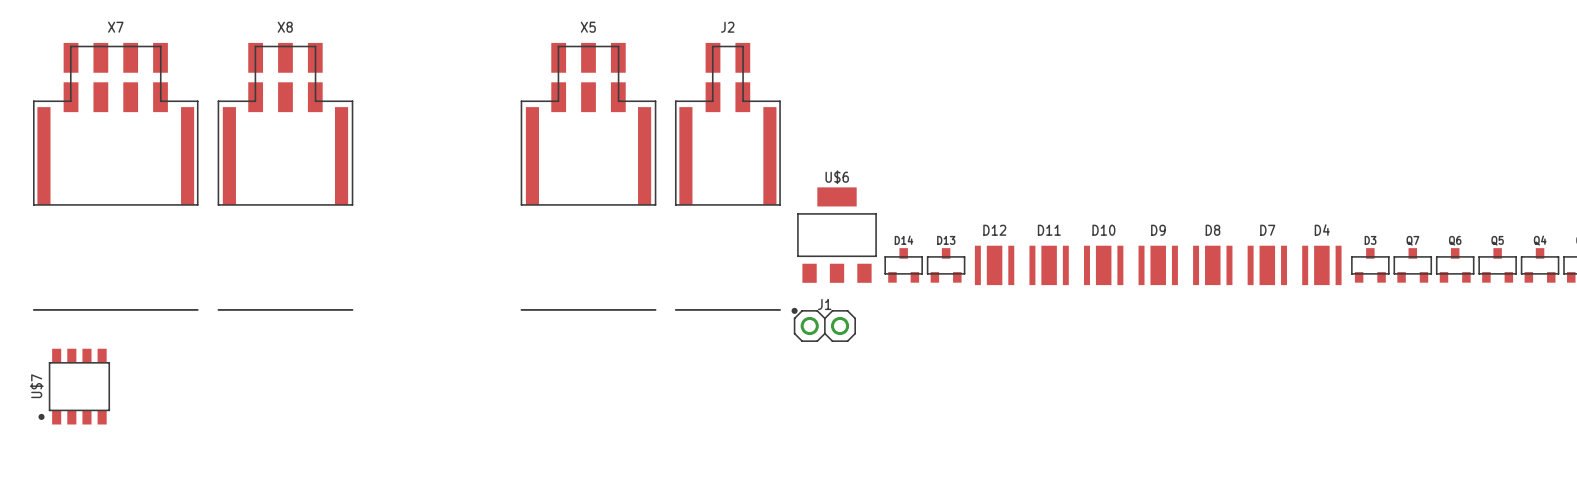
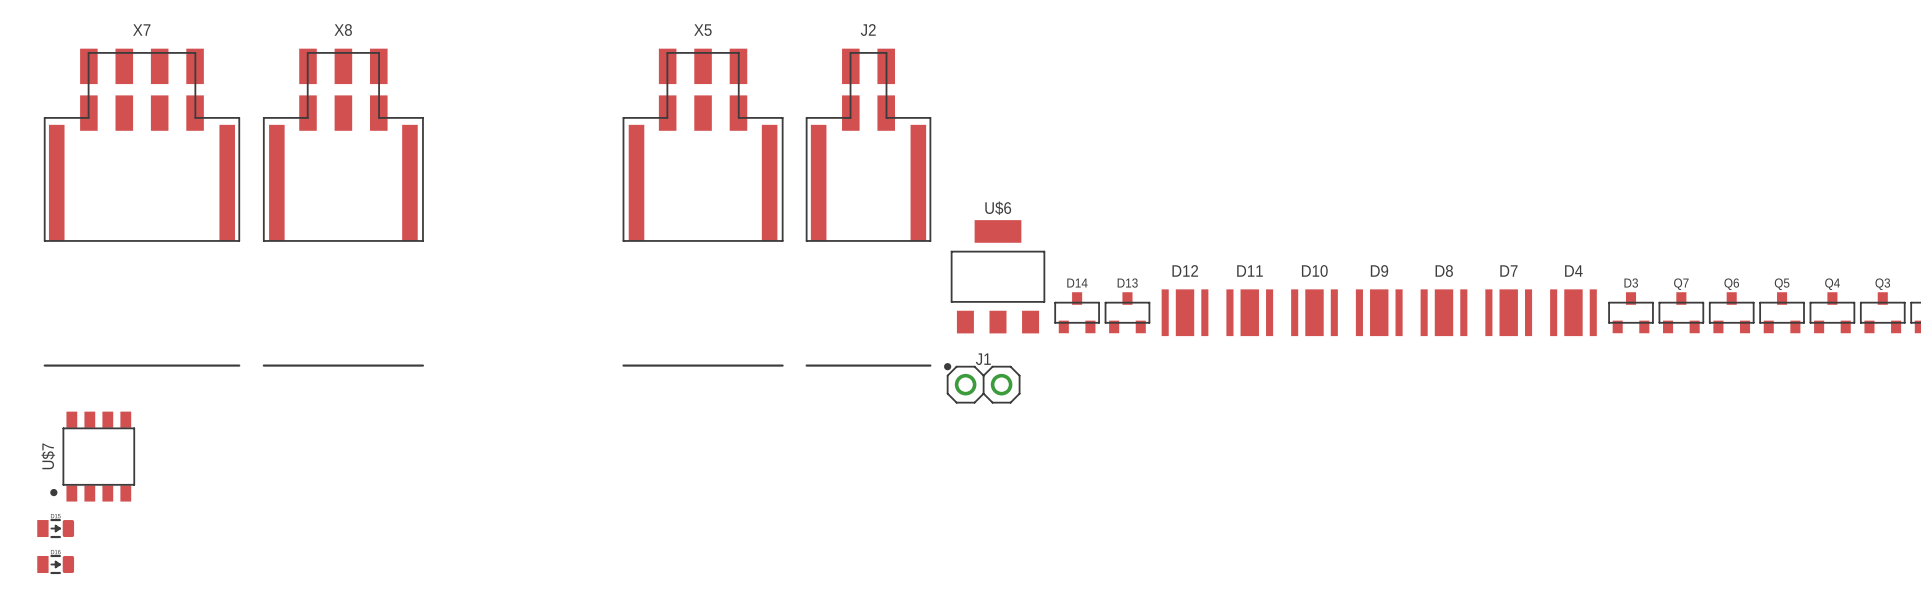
part: none -> (55, 528)
part: none -> (55, 564)

